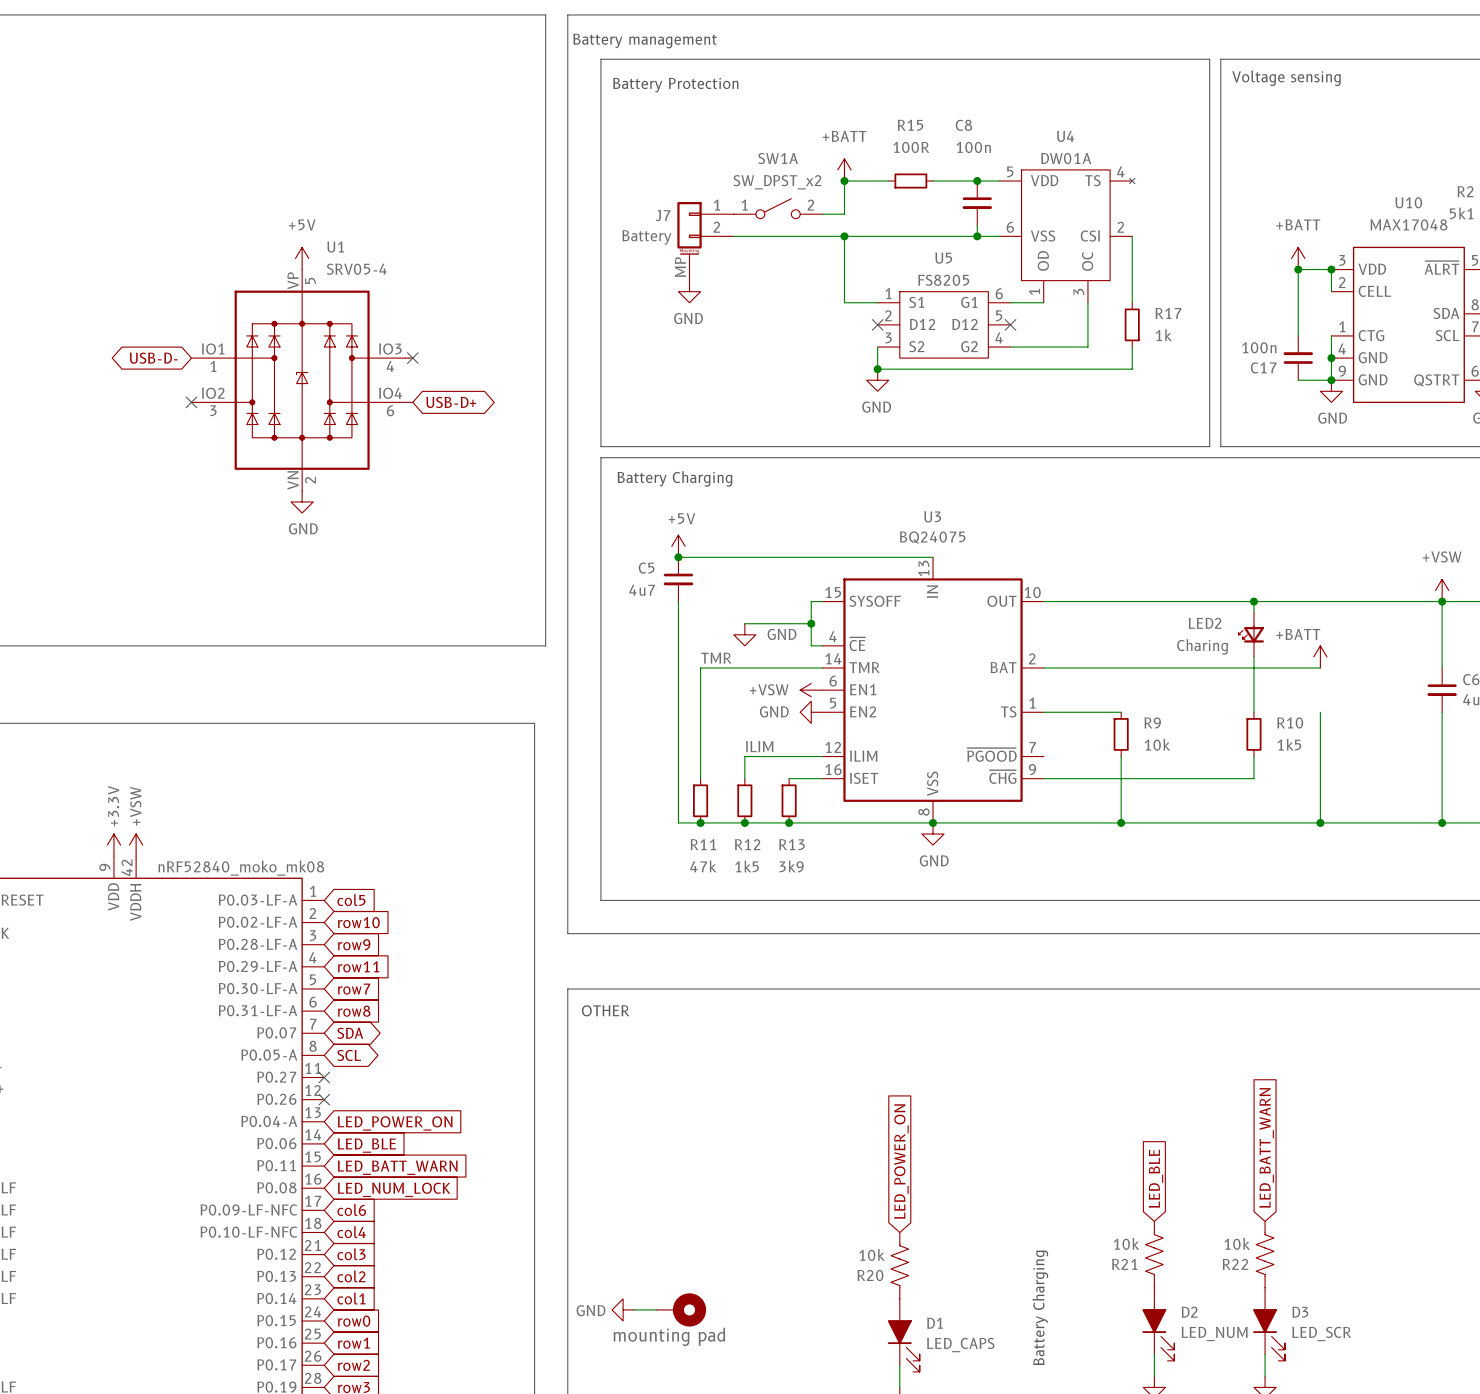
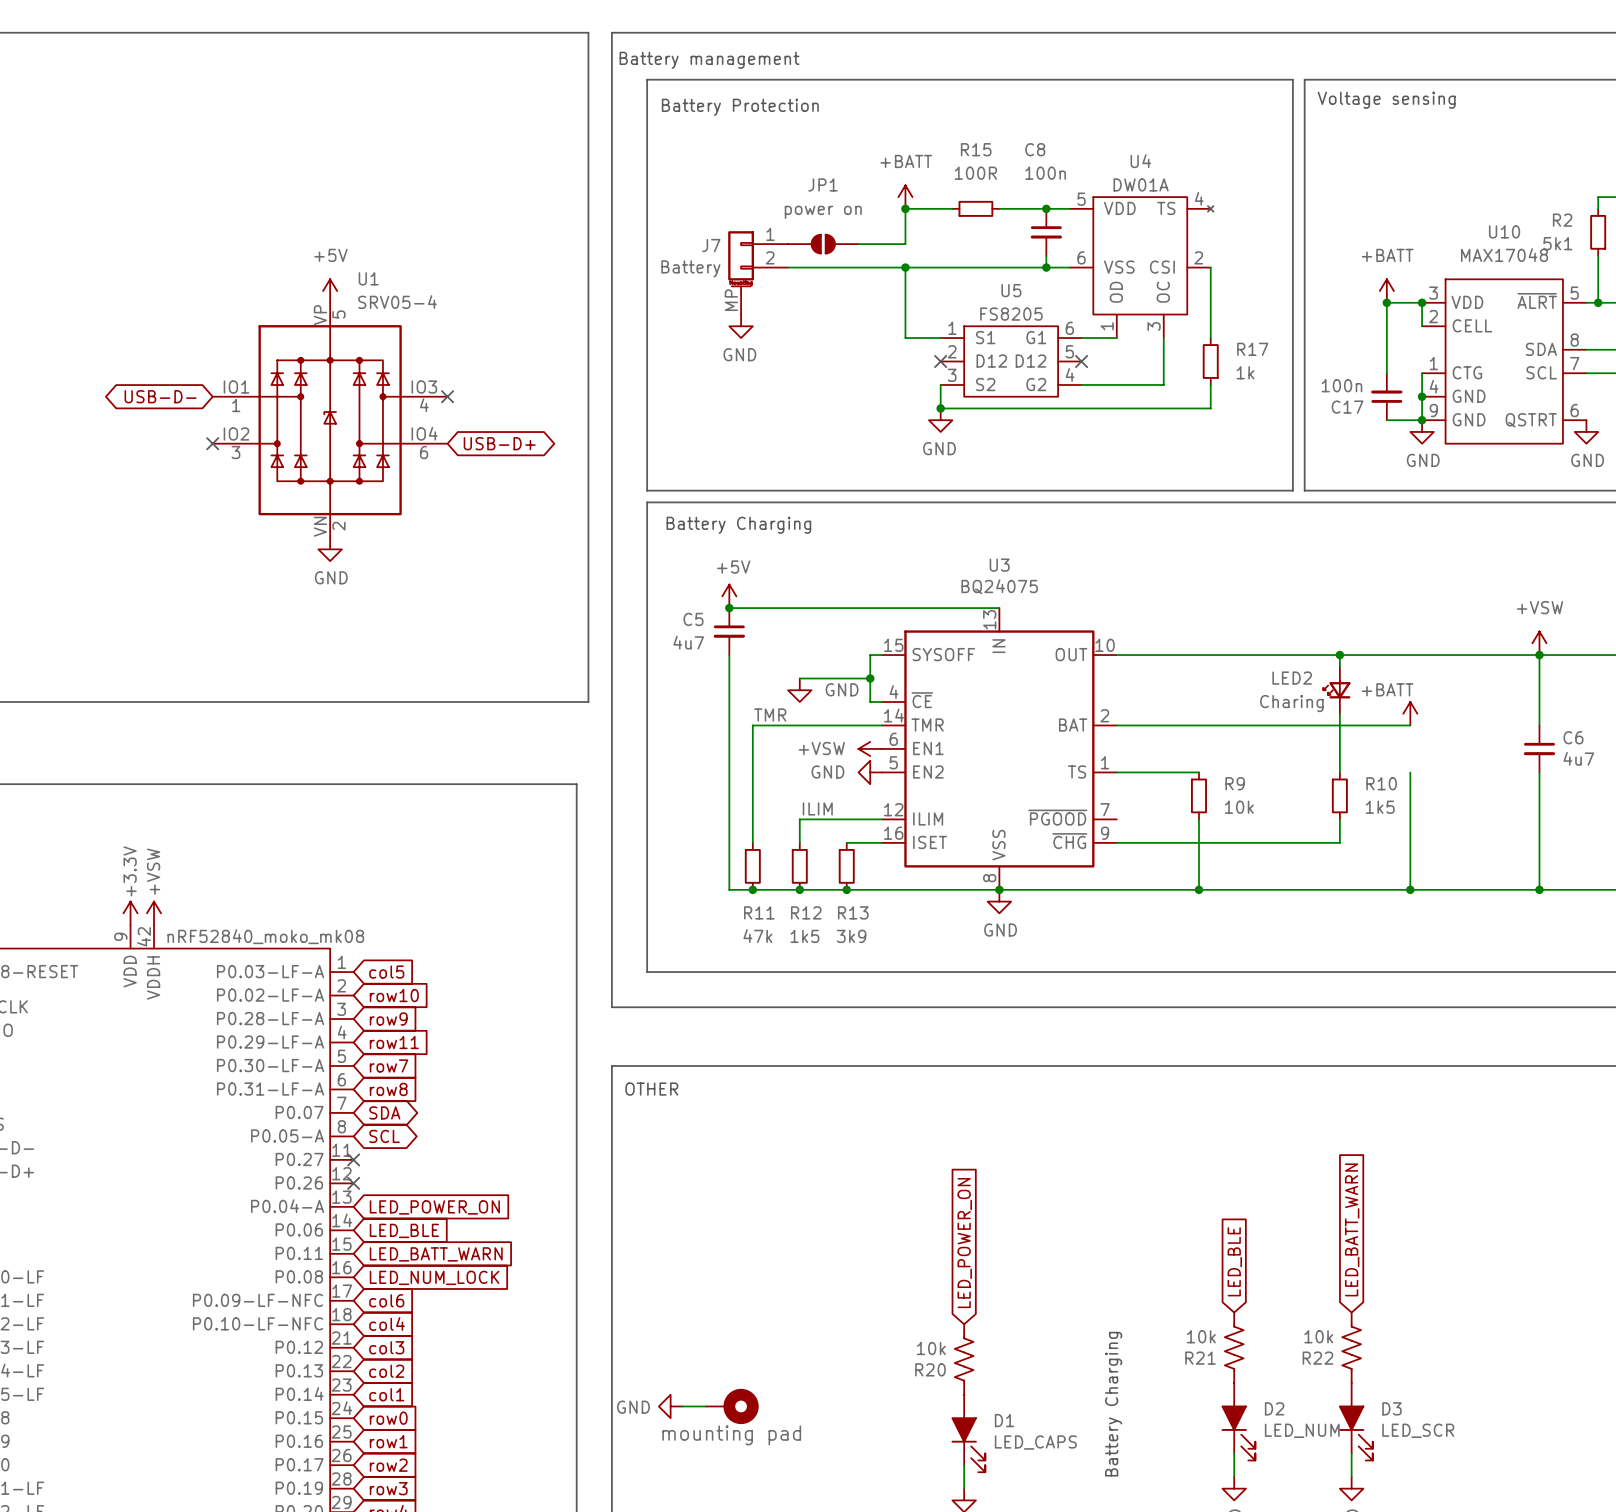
SW1A: SW_DPST_x2 (778, 208) -> none
JP1: none -> power on (823, 244)

